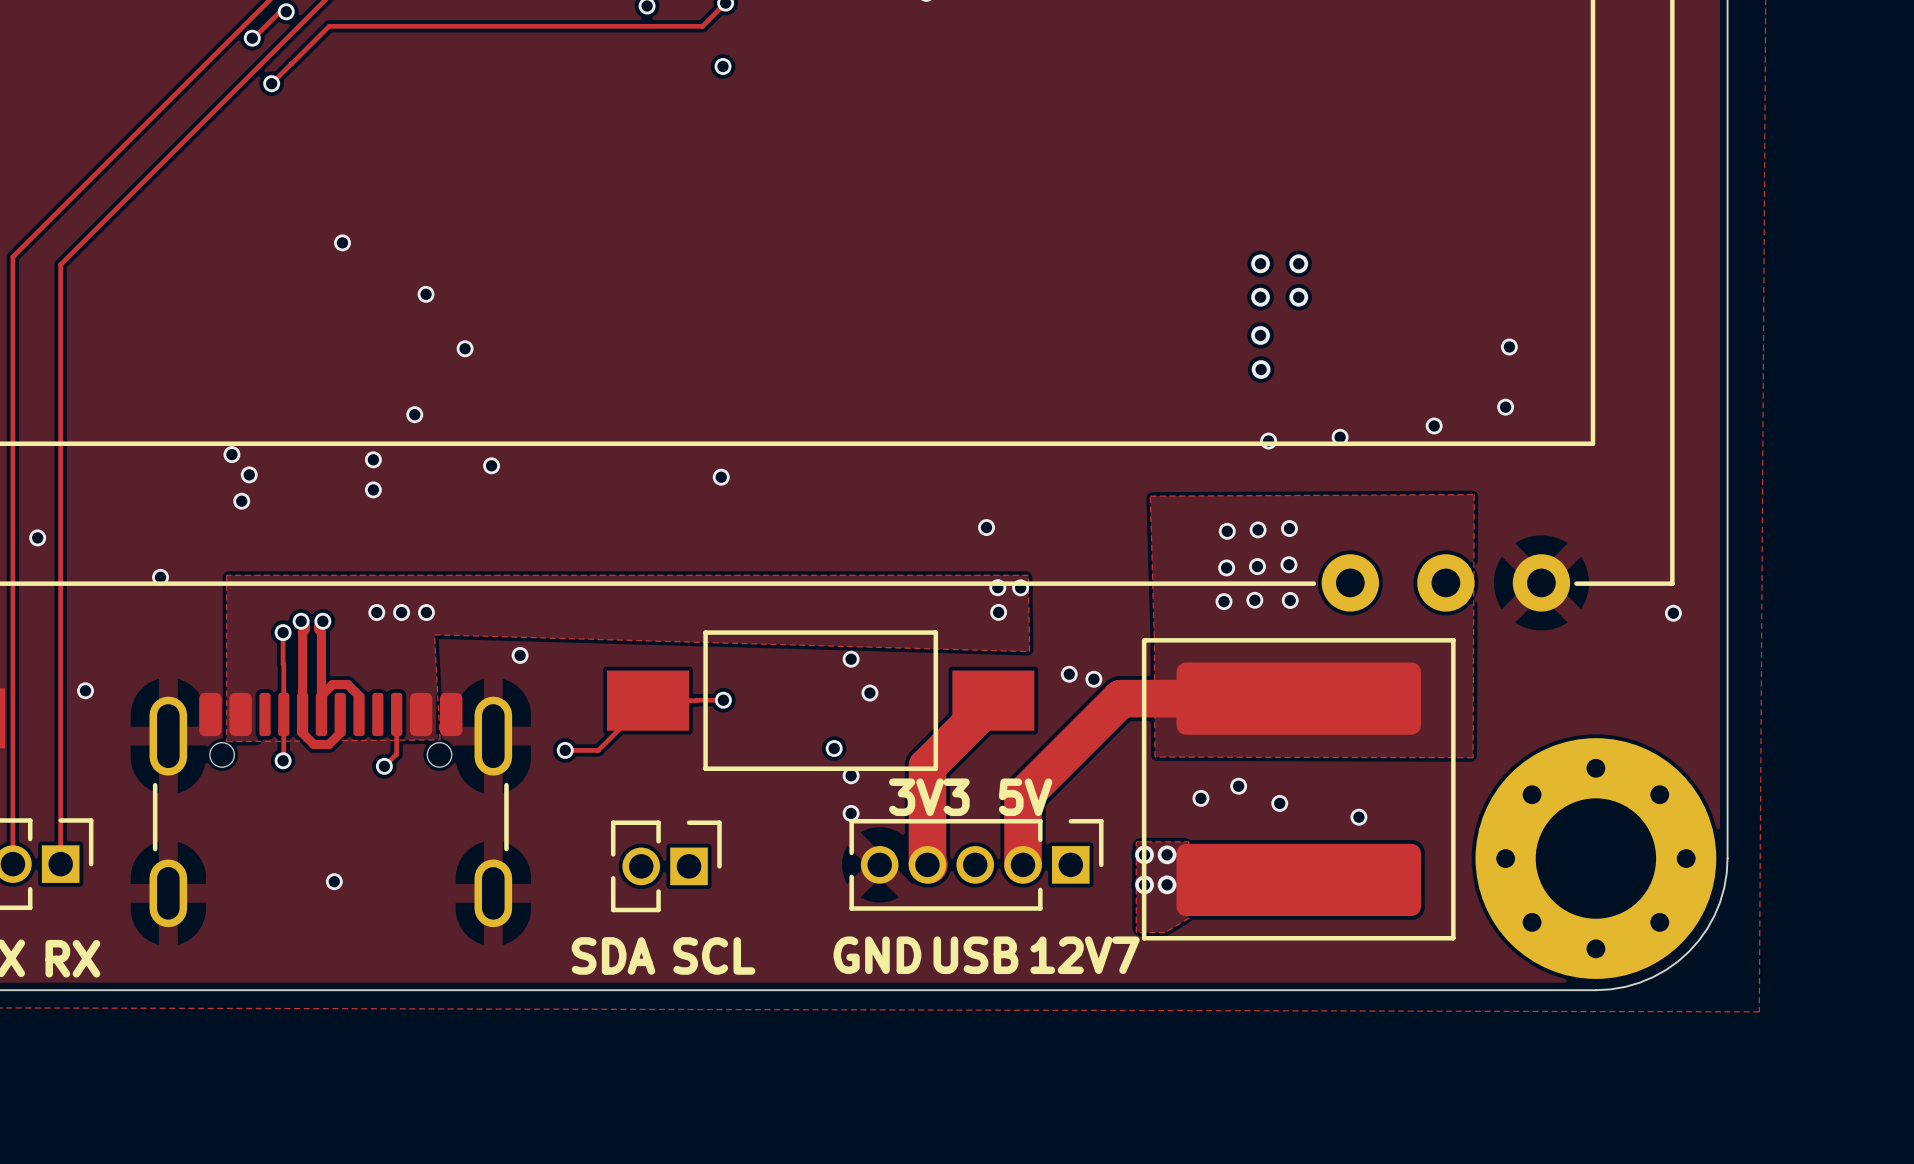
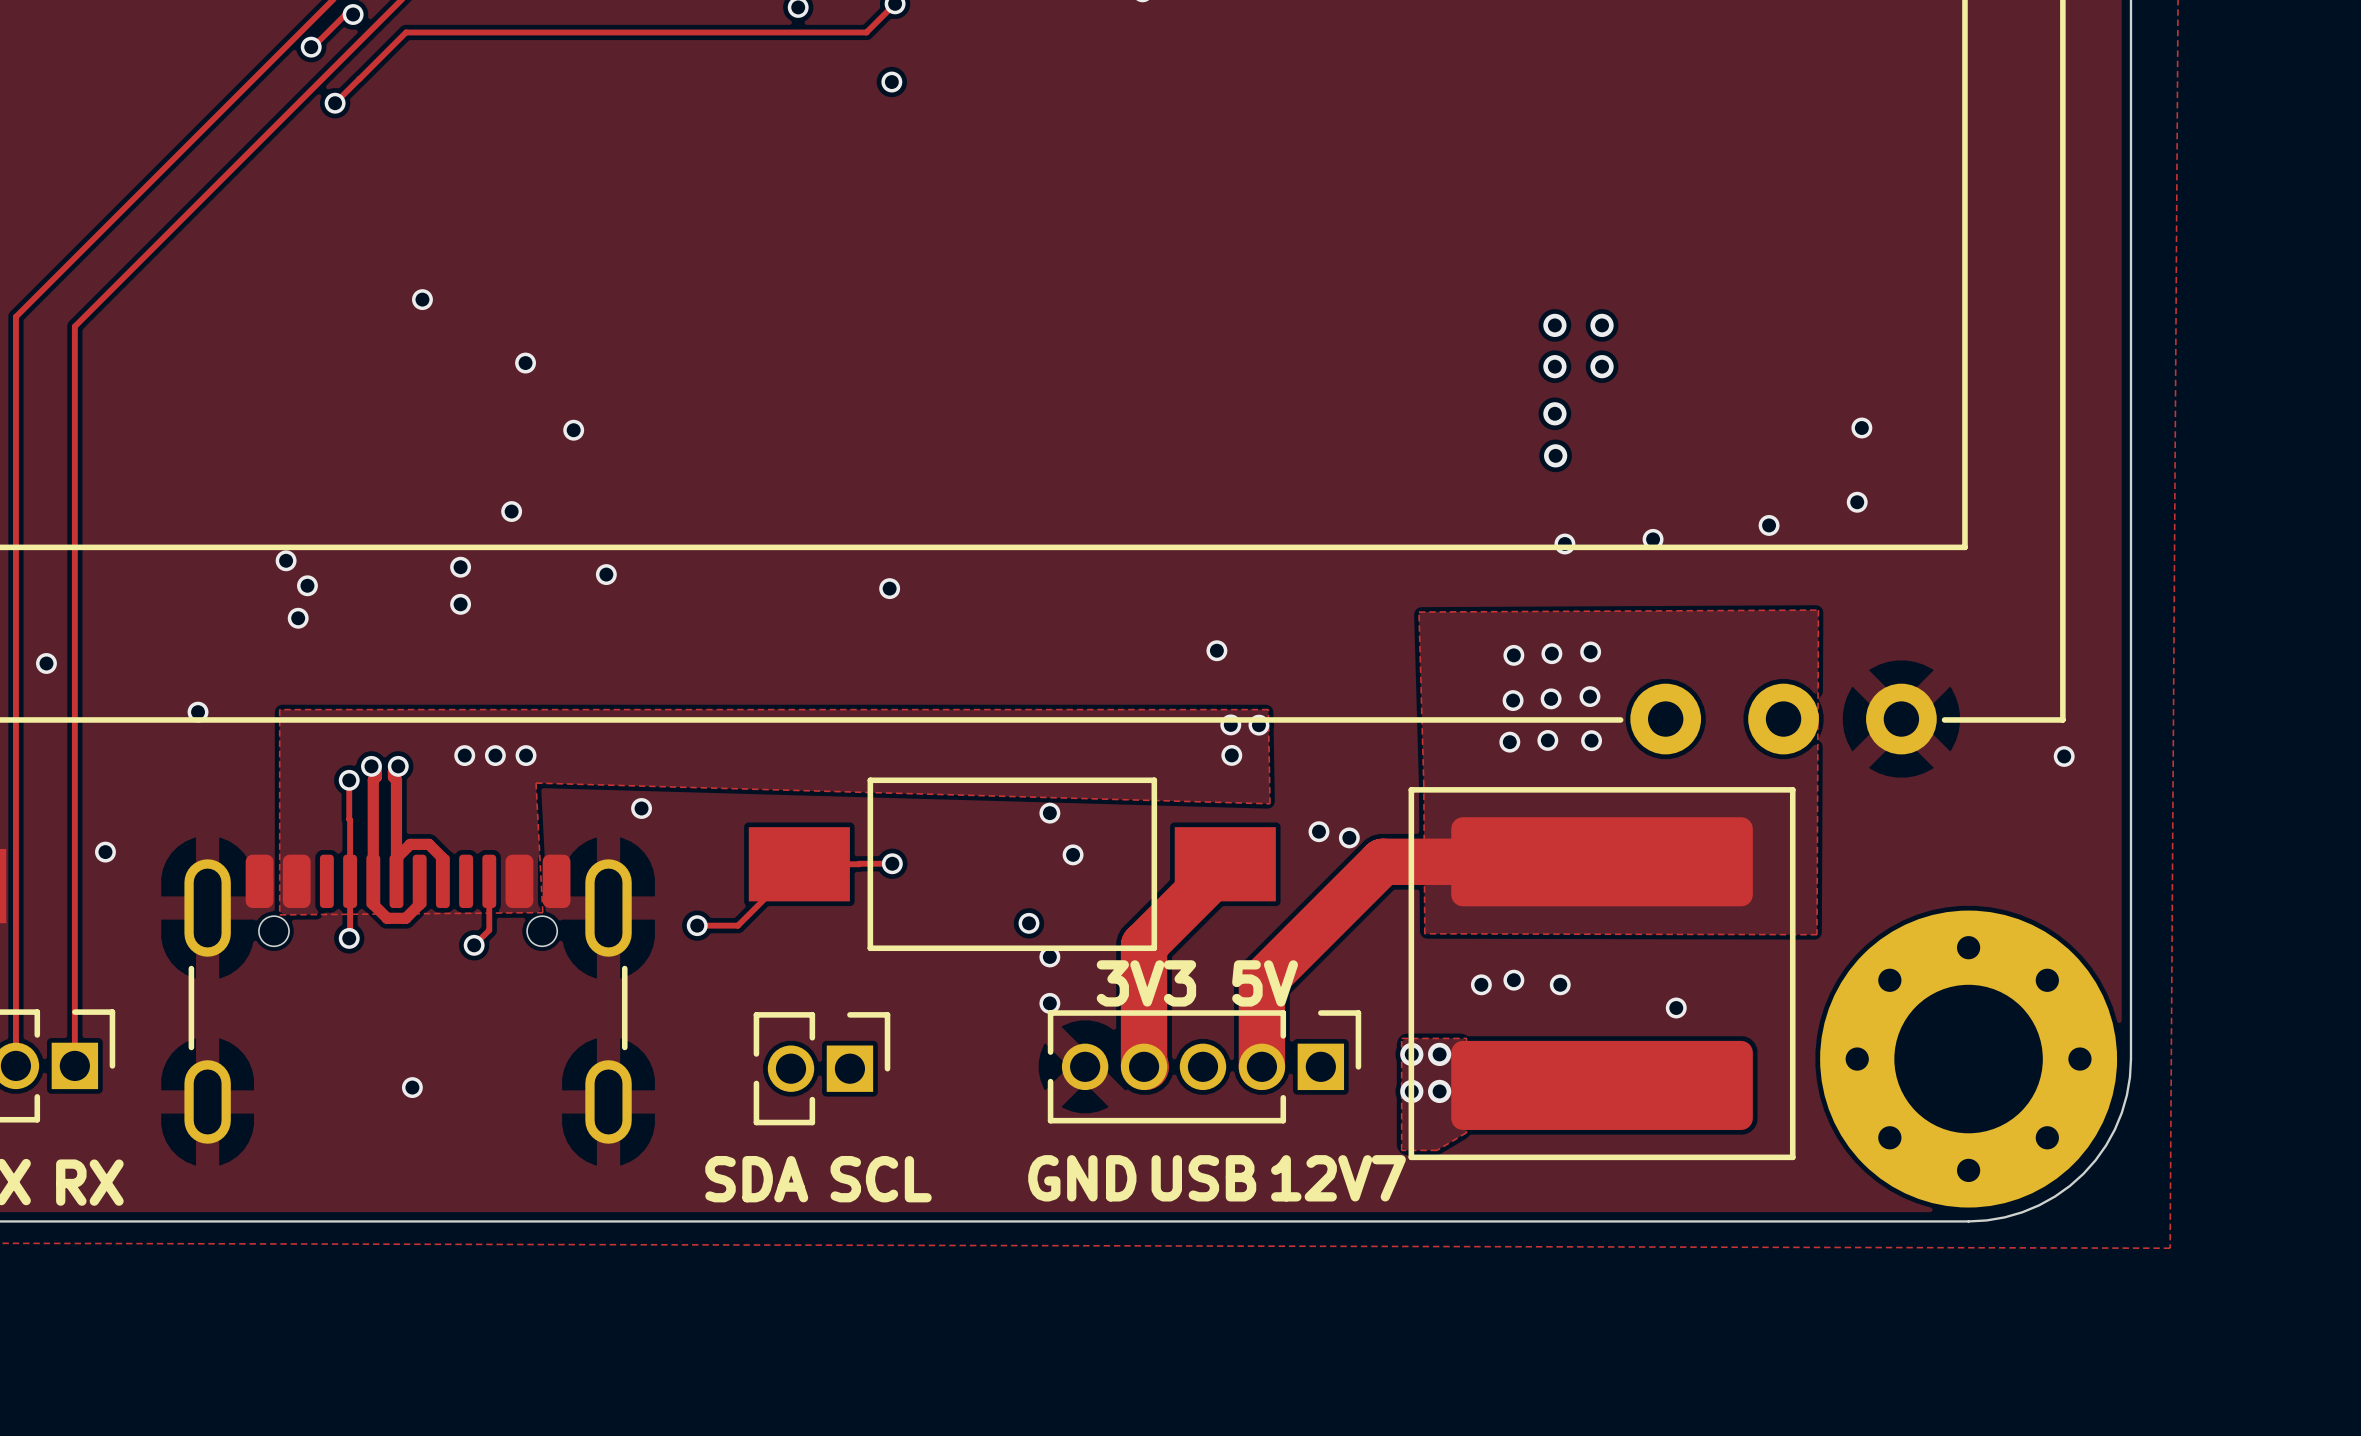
via position: (1238, 786) -> (1513, 980)
via position: (1279, 803) -> (1560, 984)

